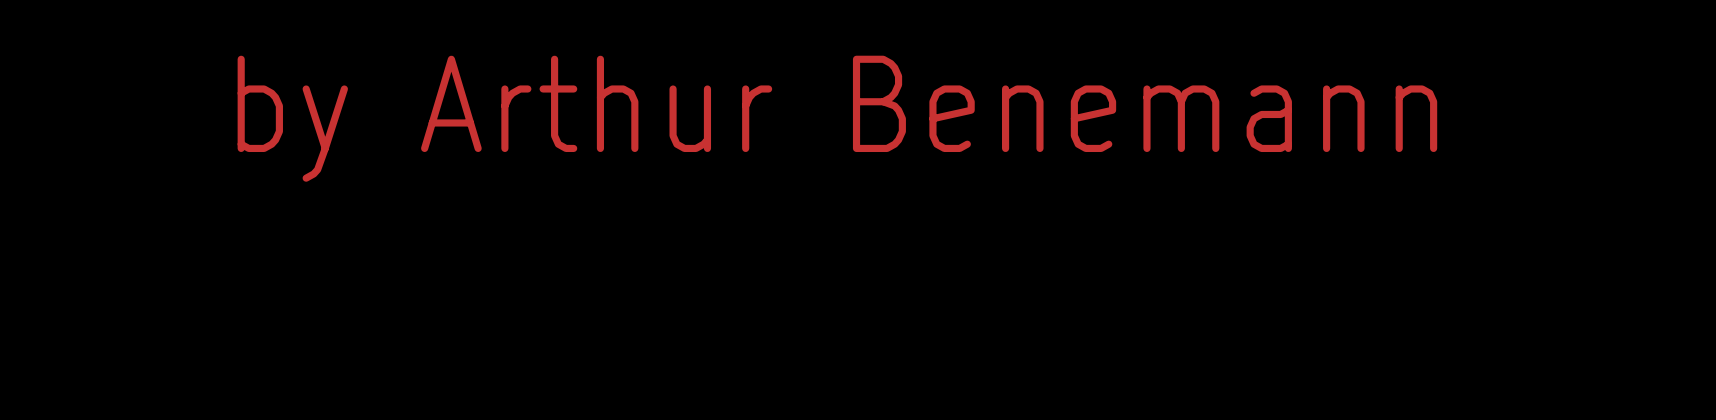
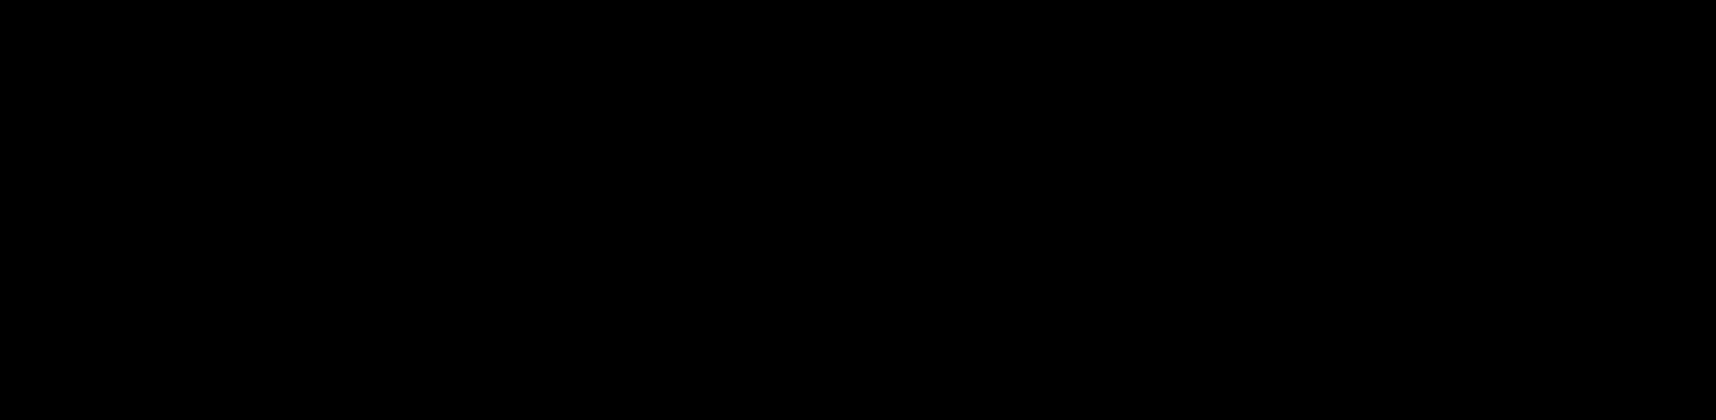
text: by Arthur Benemann (837, 118) -> none

